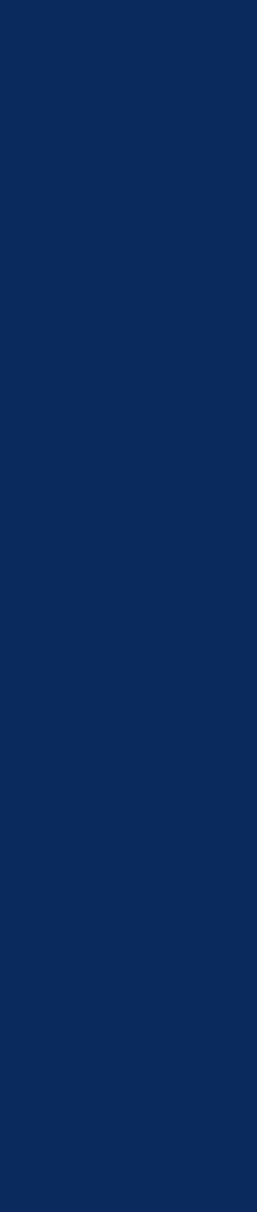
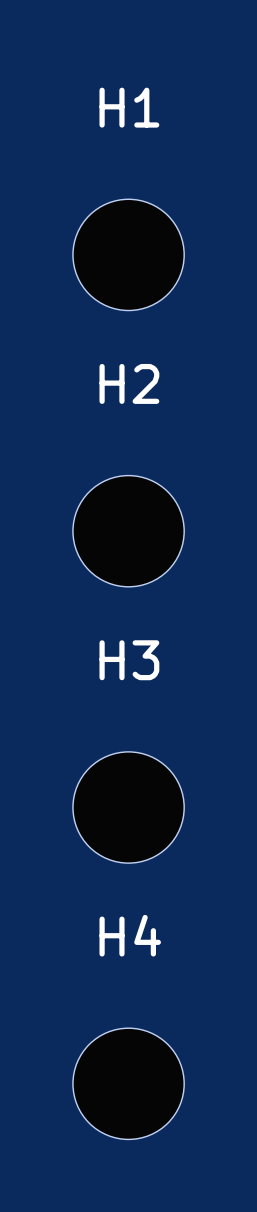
H1: none -> (128, 254)
H2: none -> (128, 531)
H3: none -> (128, 807)
H4: none -> (128, 1083)

